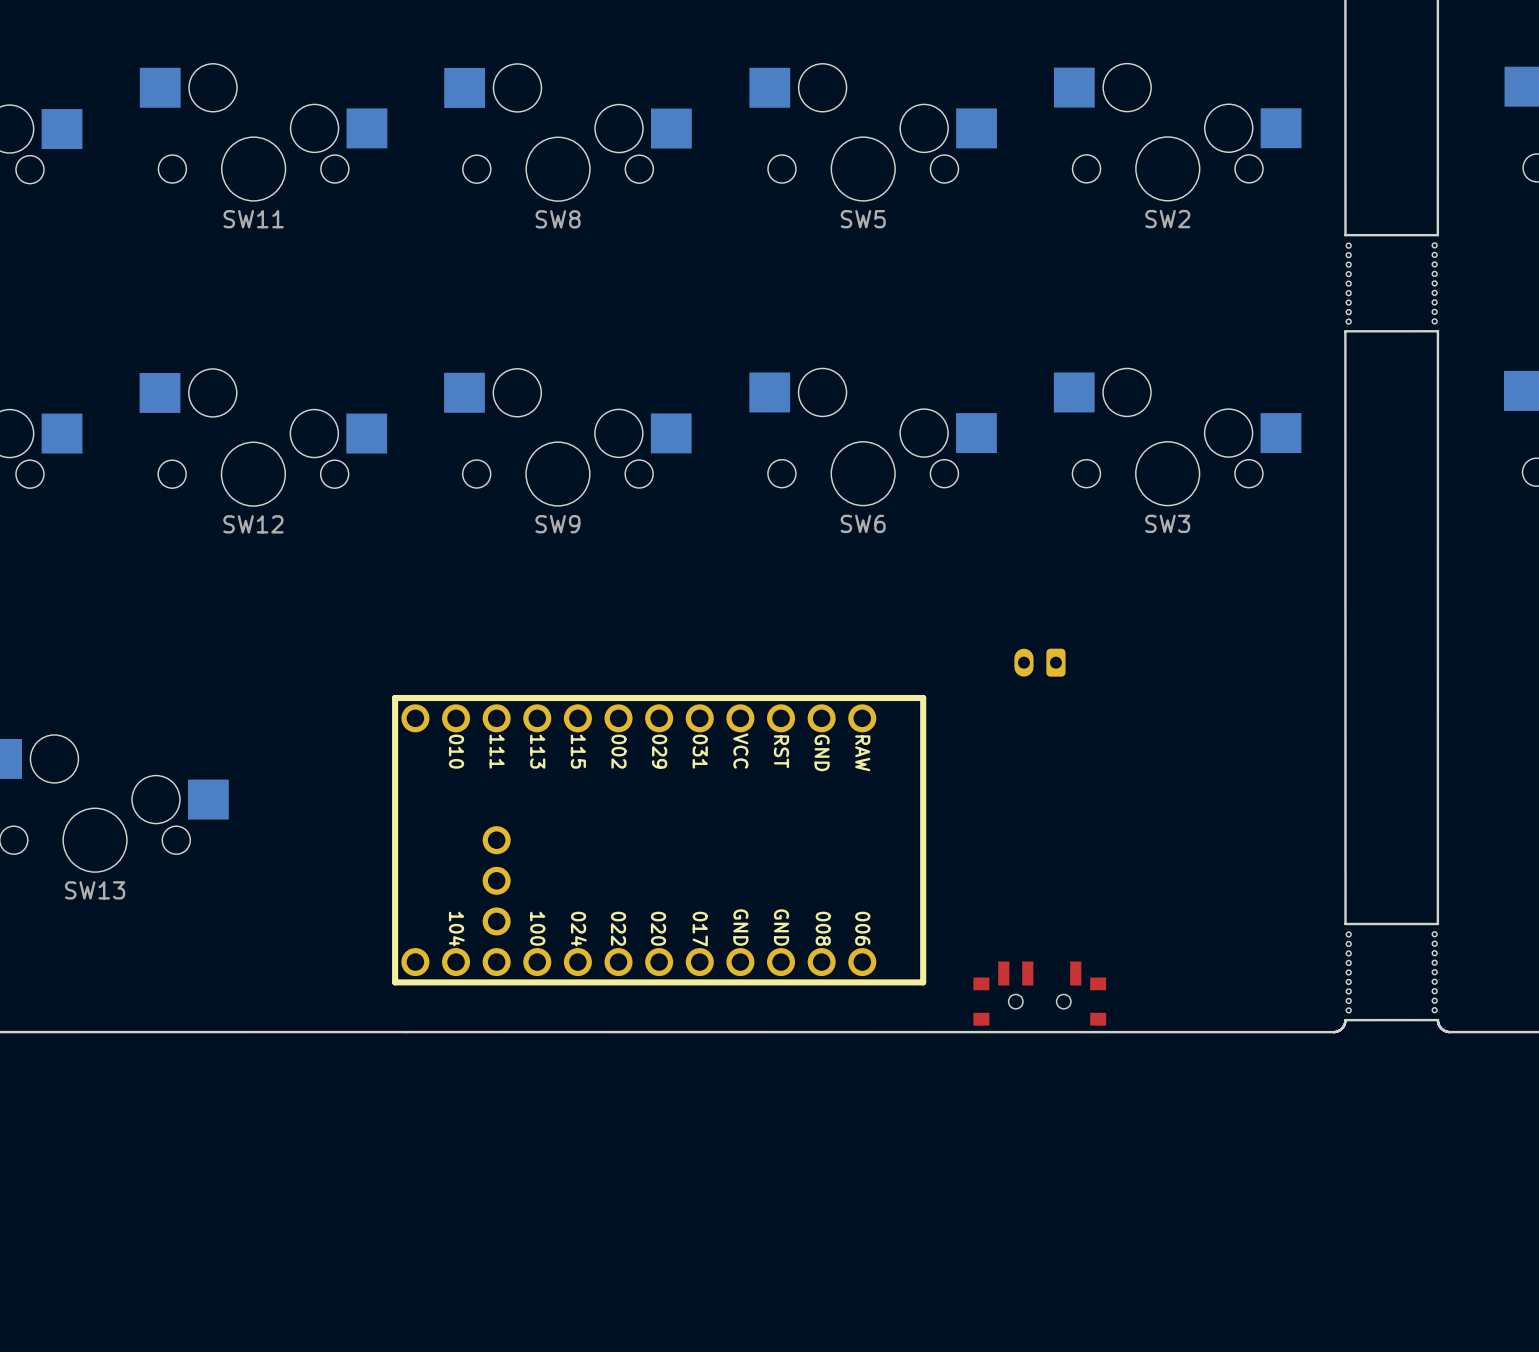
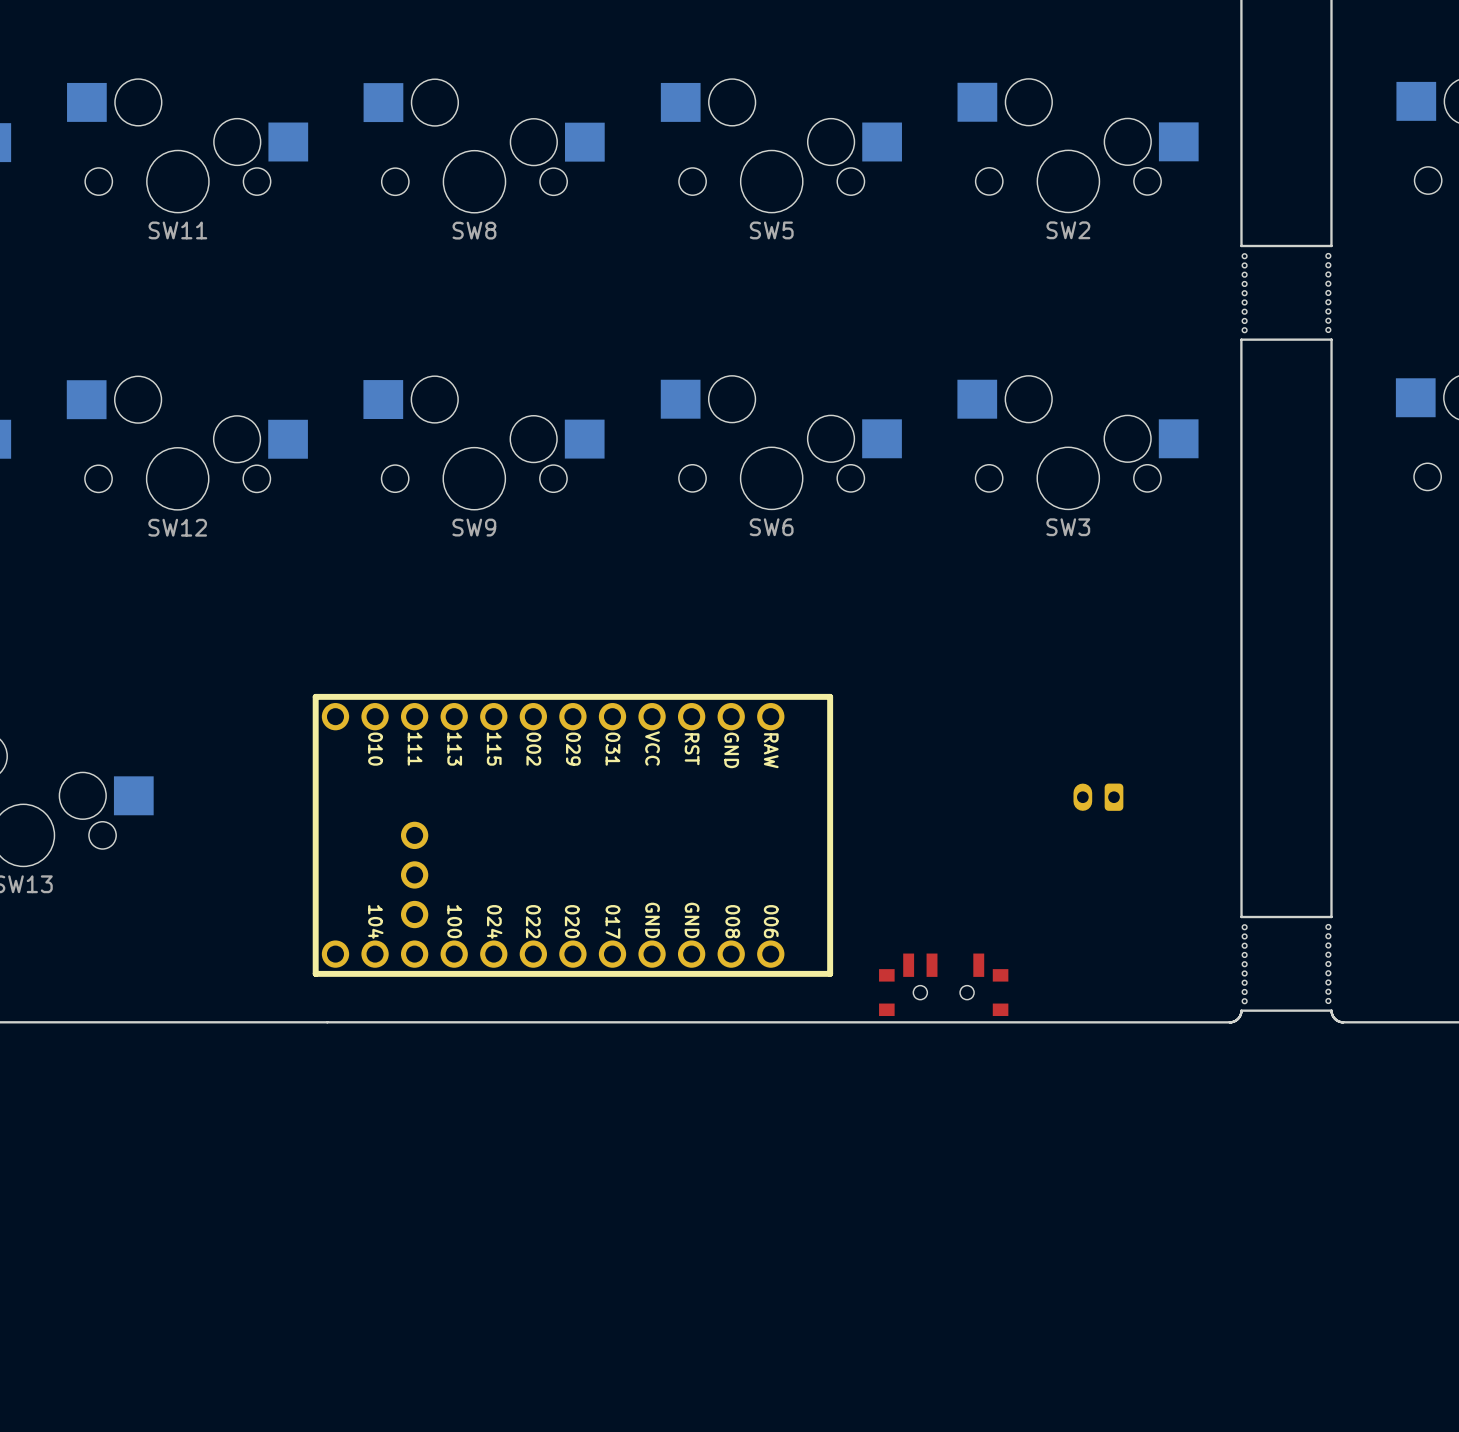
part position: (1039, 662) -> (1098, 797)

